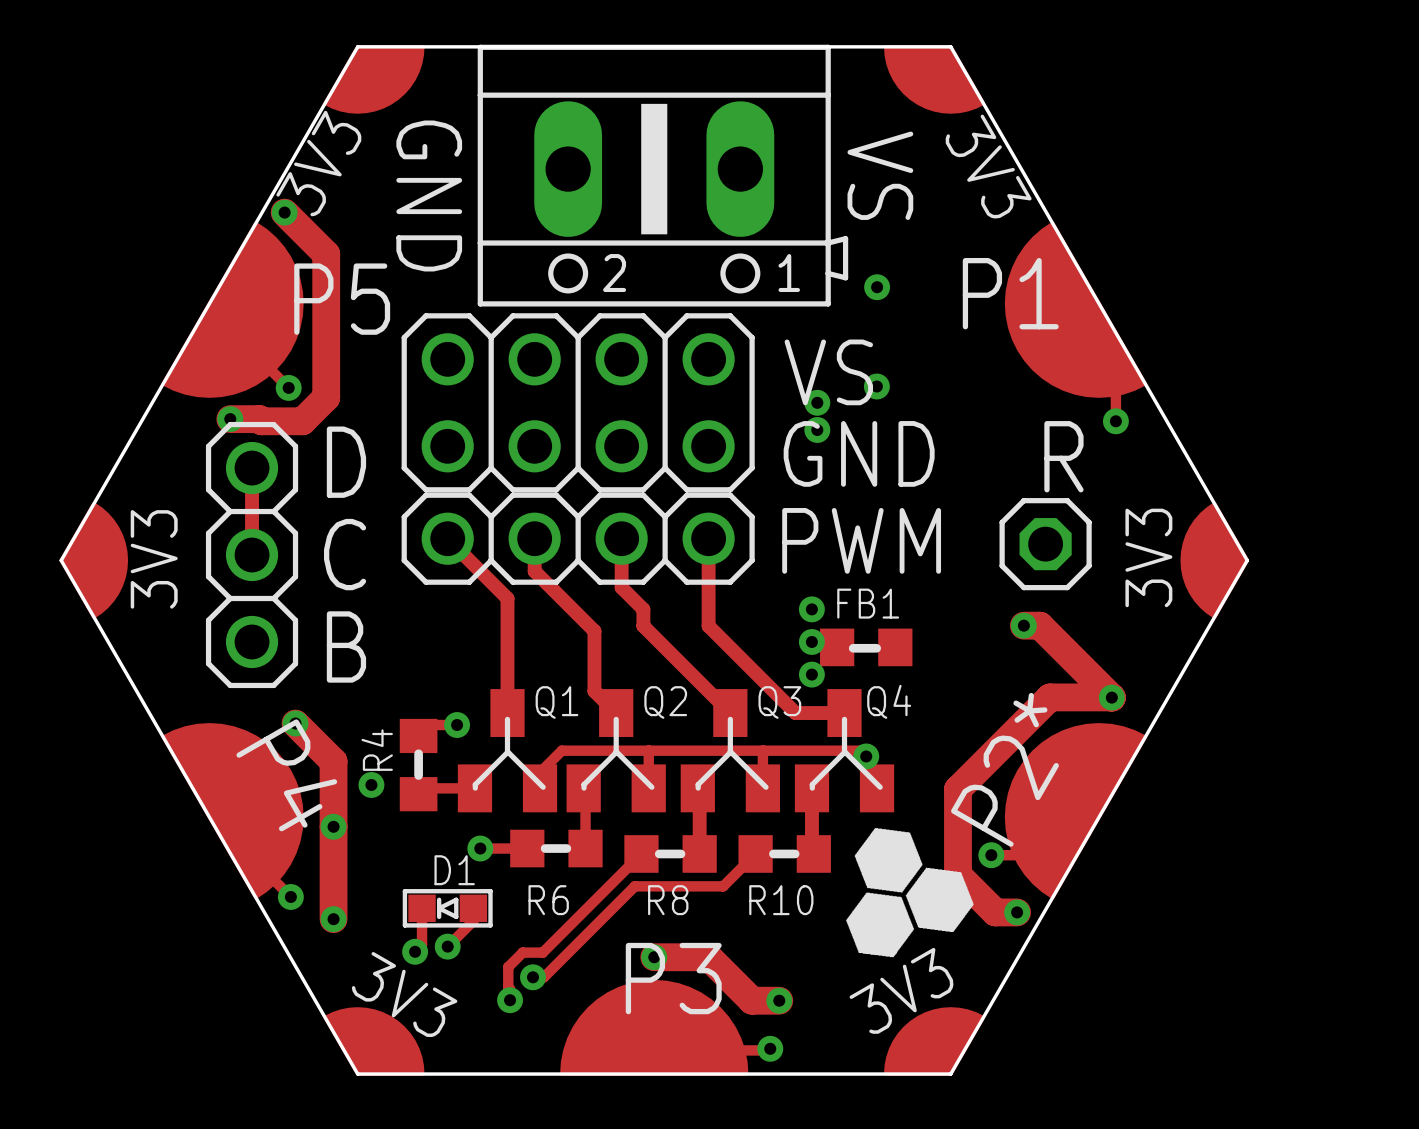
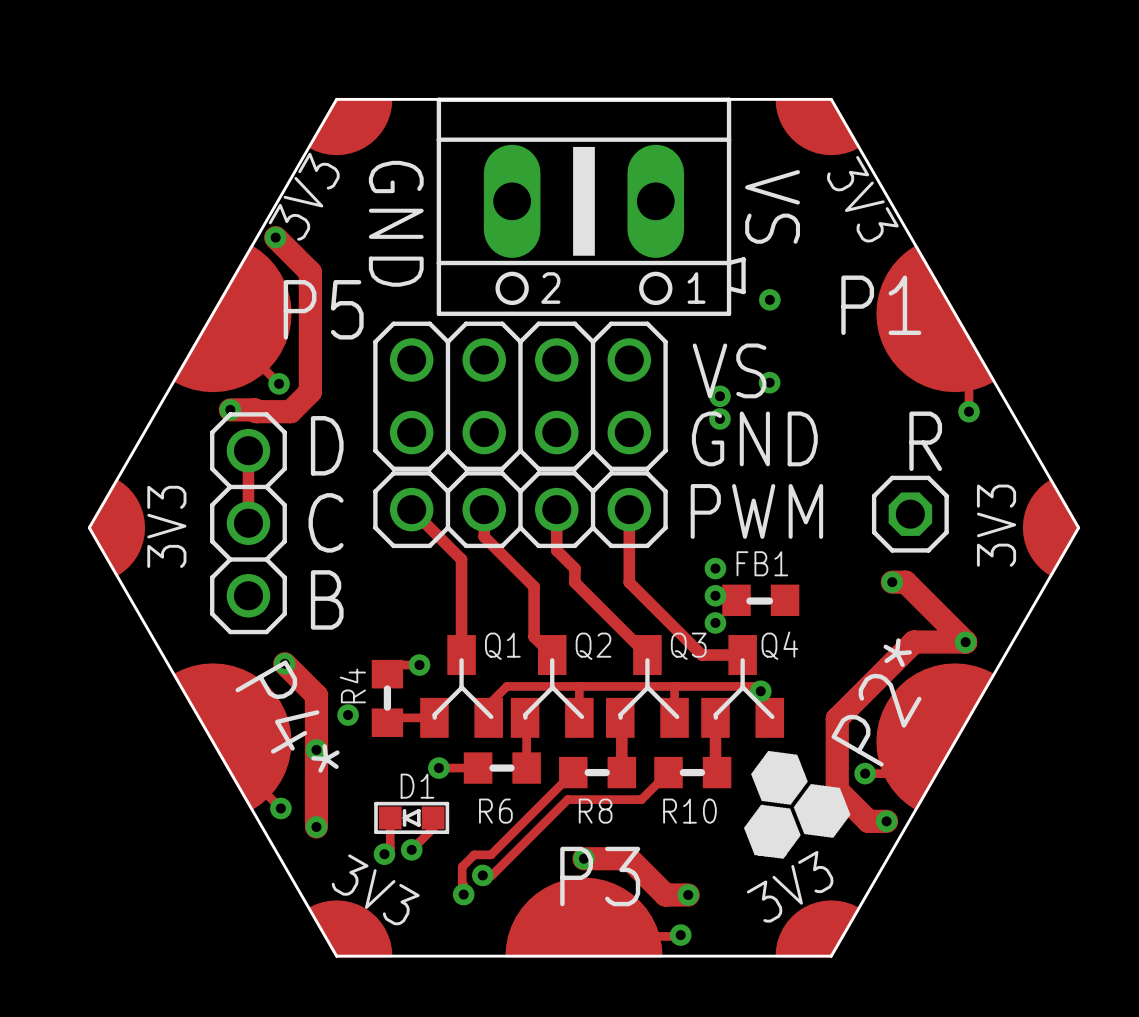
text: P4 (286, 775) -> P4* (287, 716)

